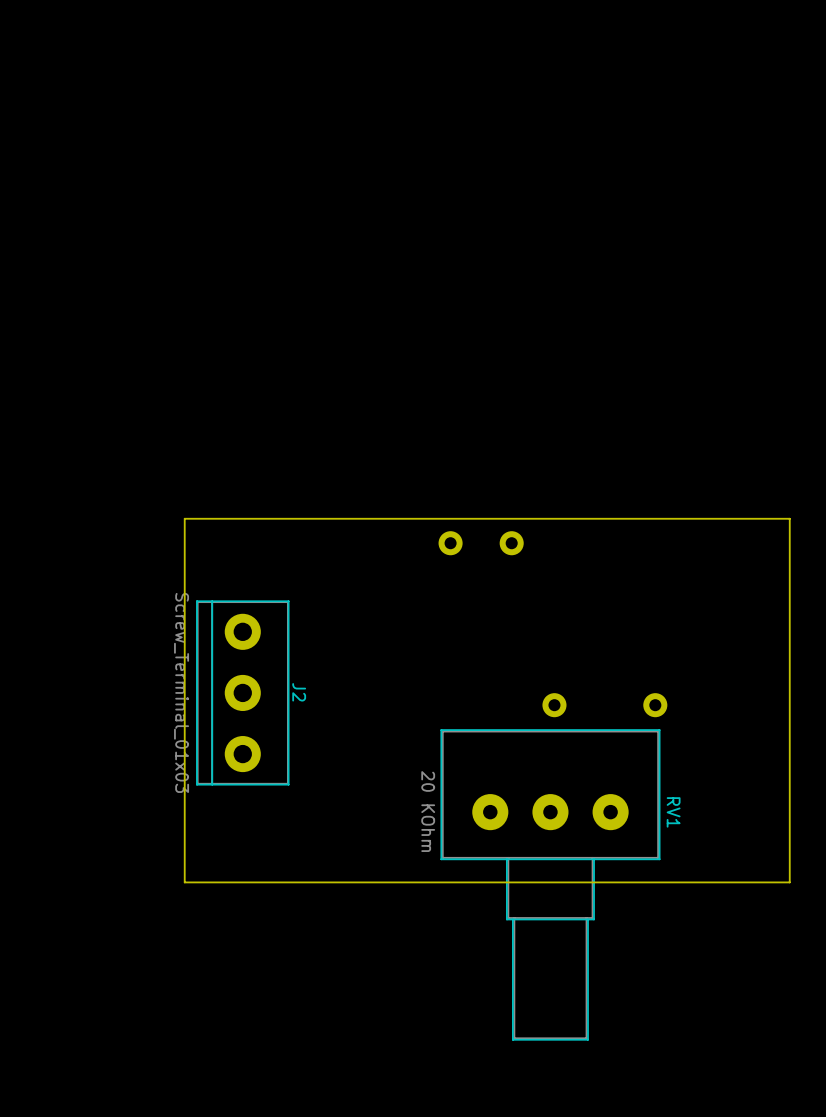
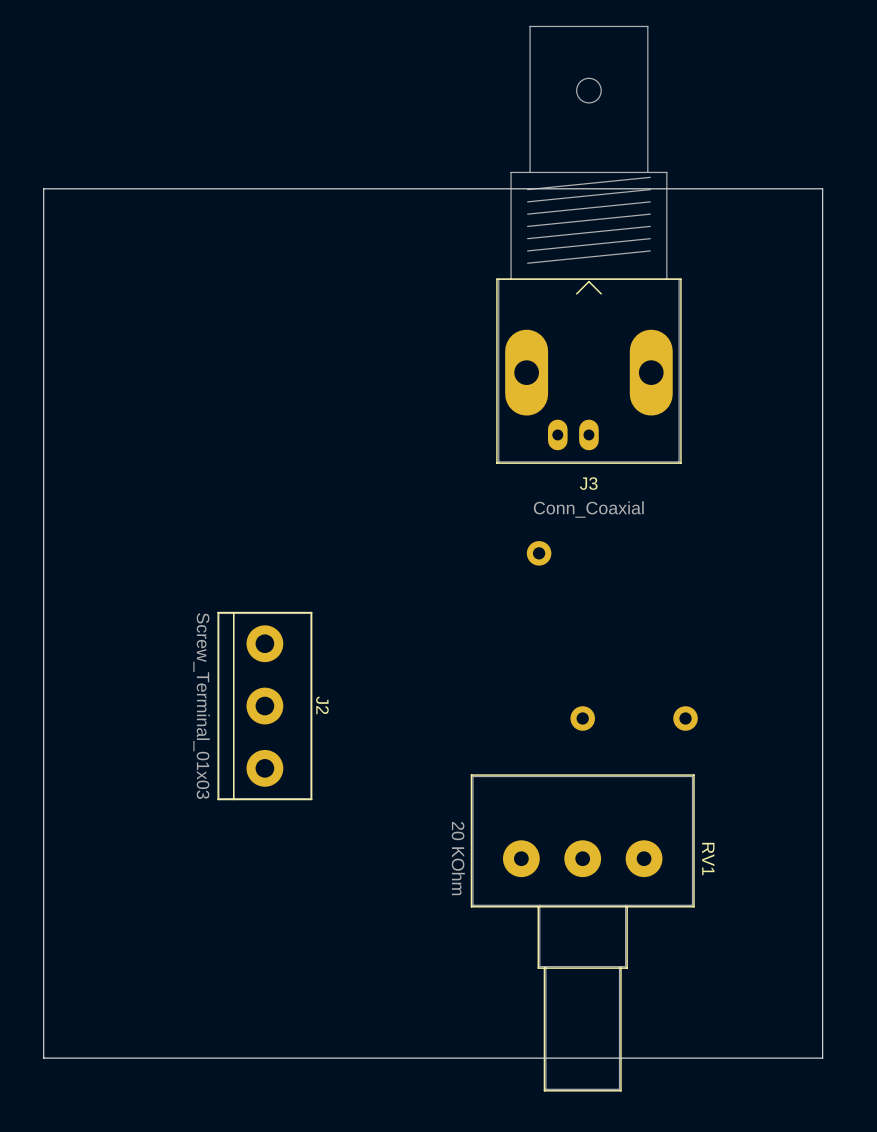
J3: none -> Conn_Coaxial (588, 244)
board edge: (789, 518) (184, 518) (184, 882) (789, 882) -> (822, 528) (822, 188) (43, 188) (43, 1058) (822, 1058) (822, 899)
part: (450, 543) -> none
RV1 position: (550, 884) -> (582, 932)

